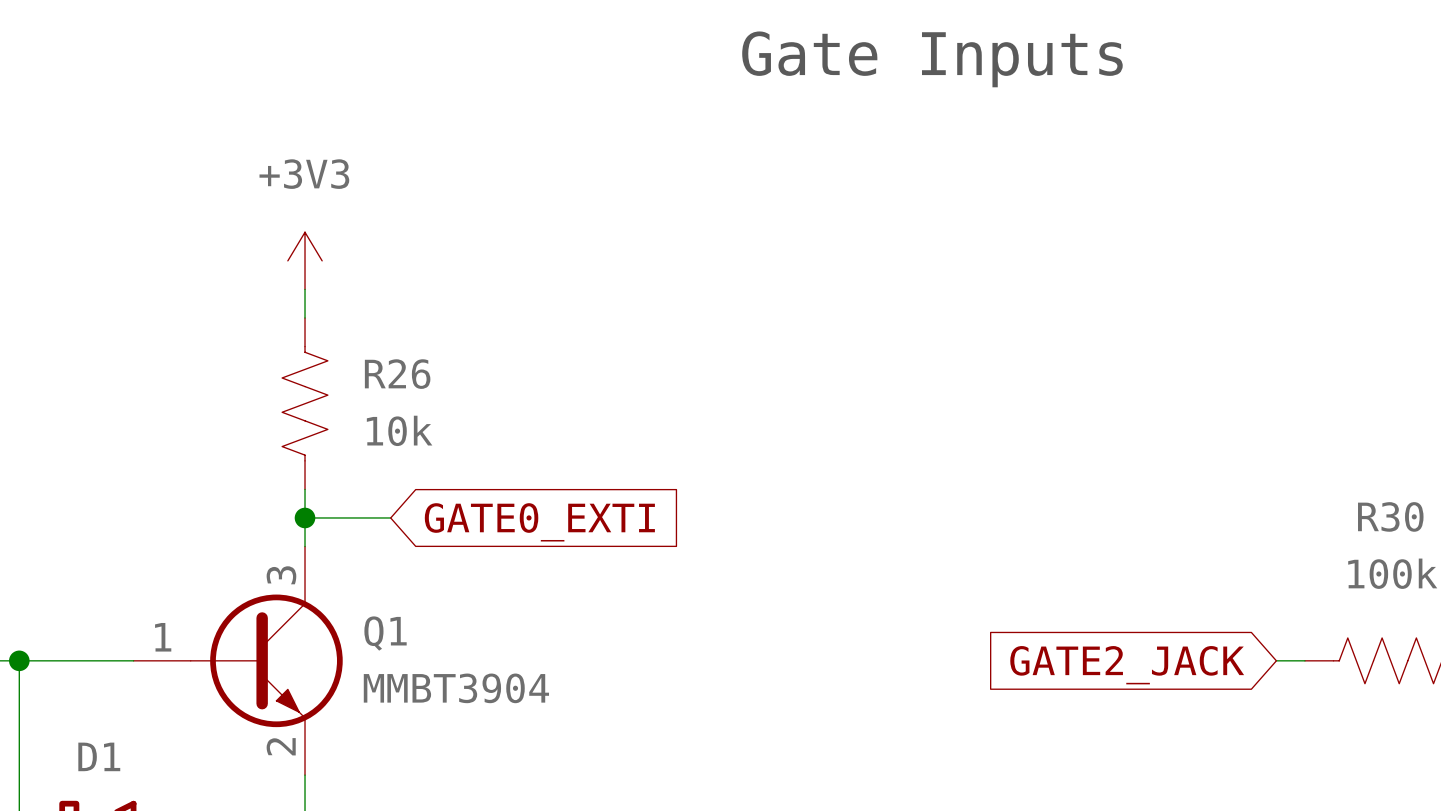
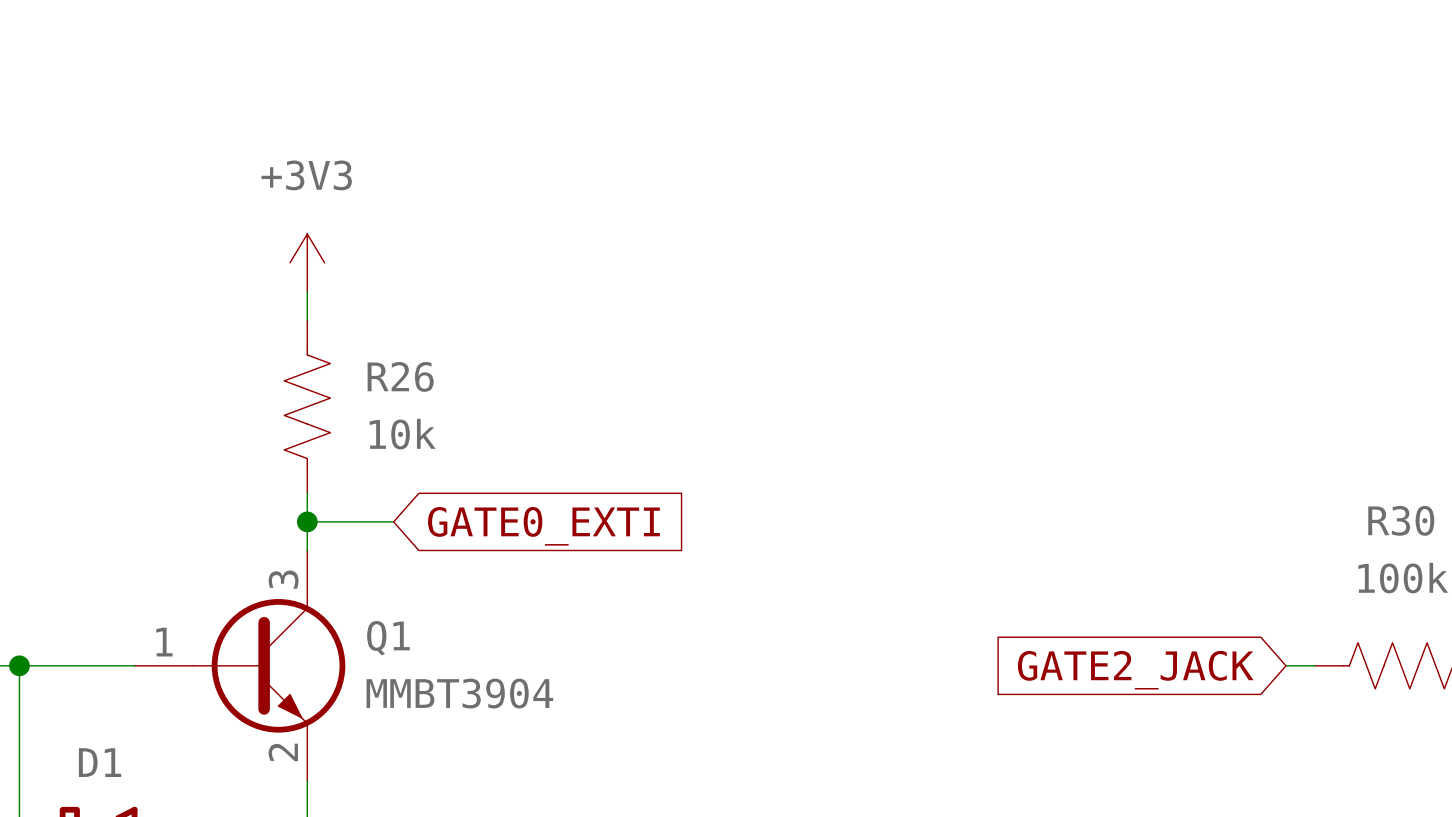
text: Gate Inputs (932, 59) -> none

